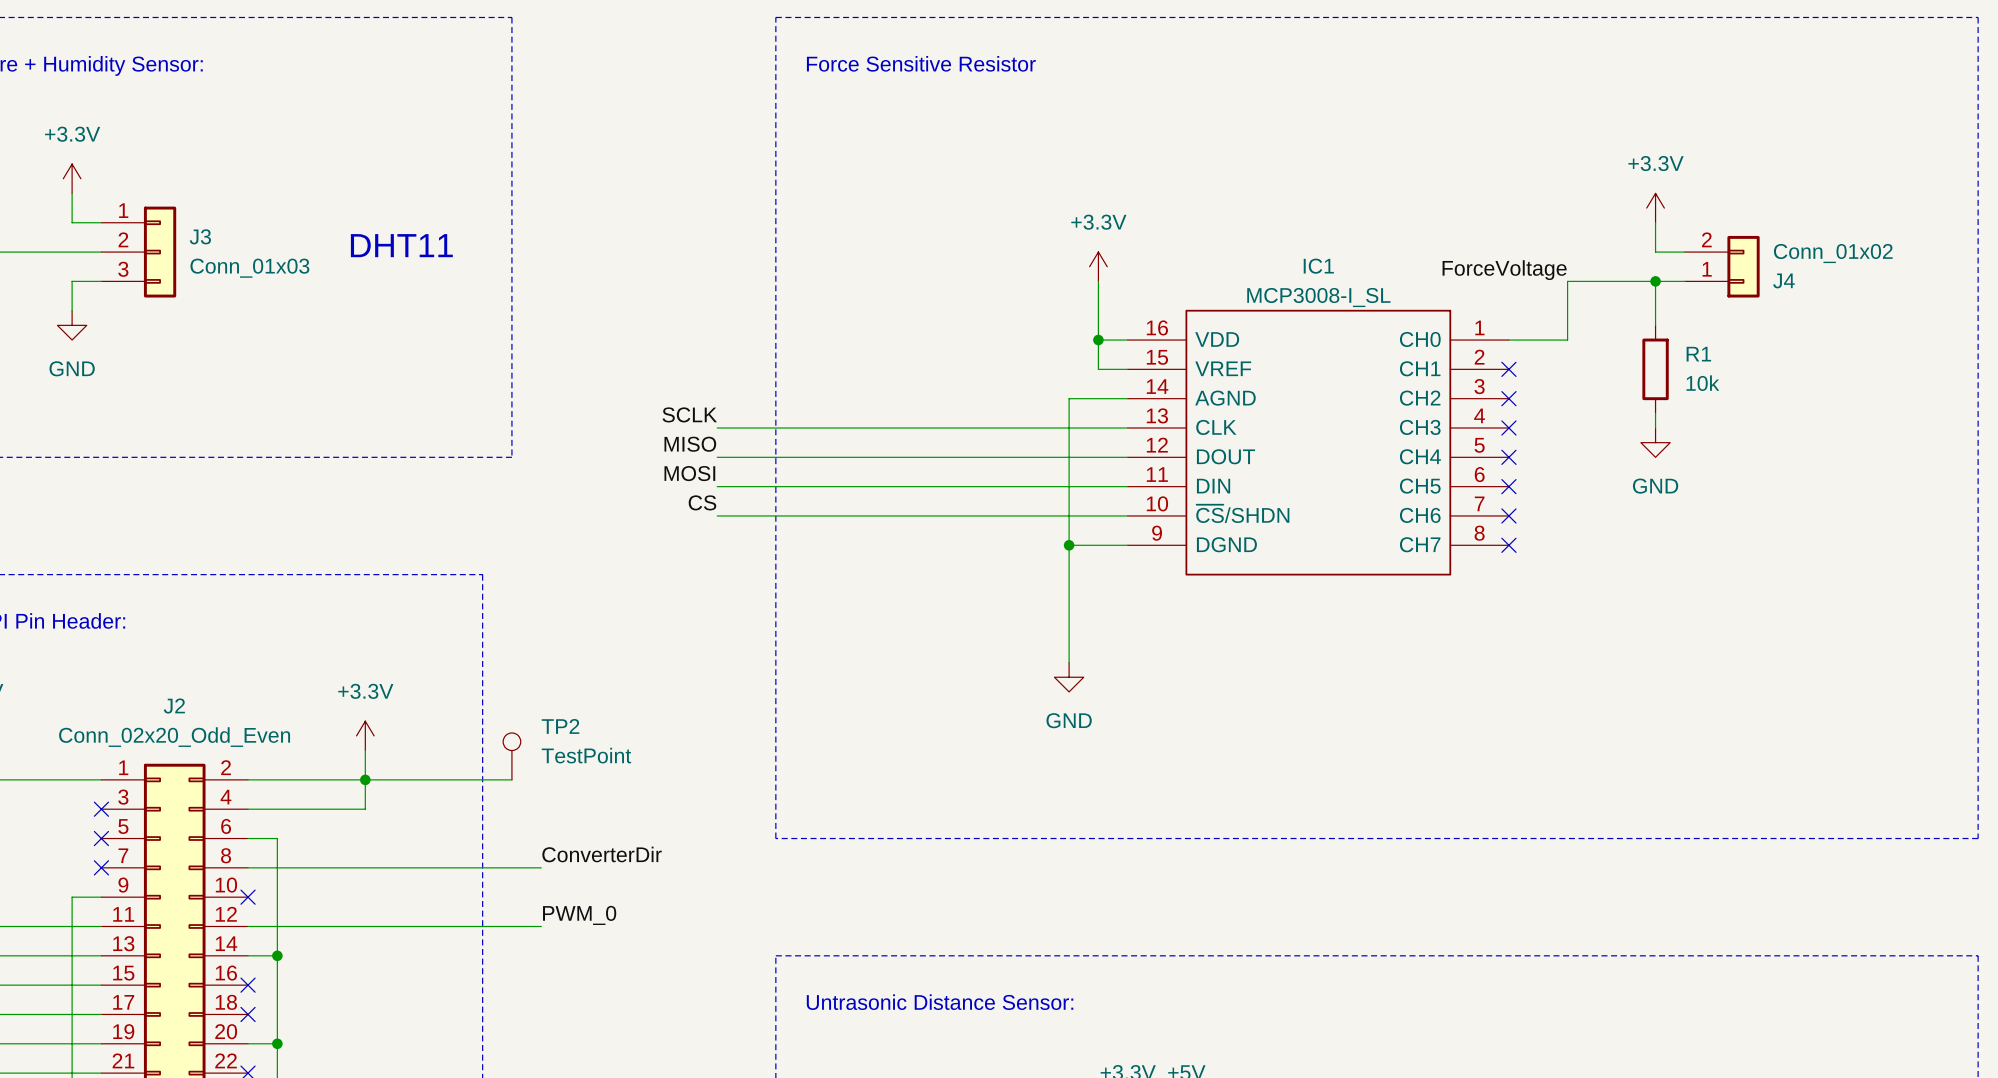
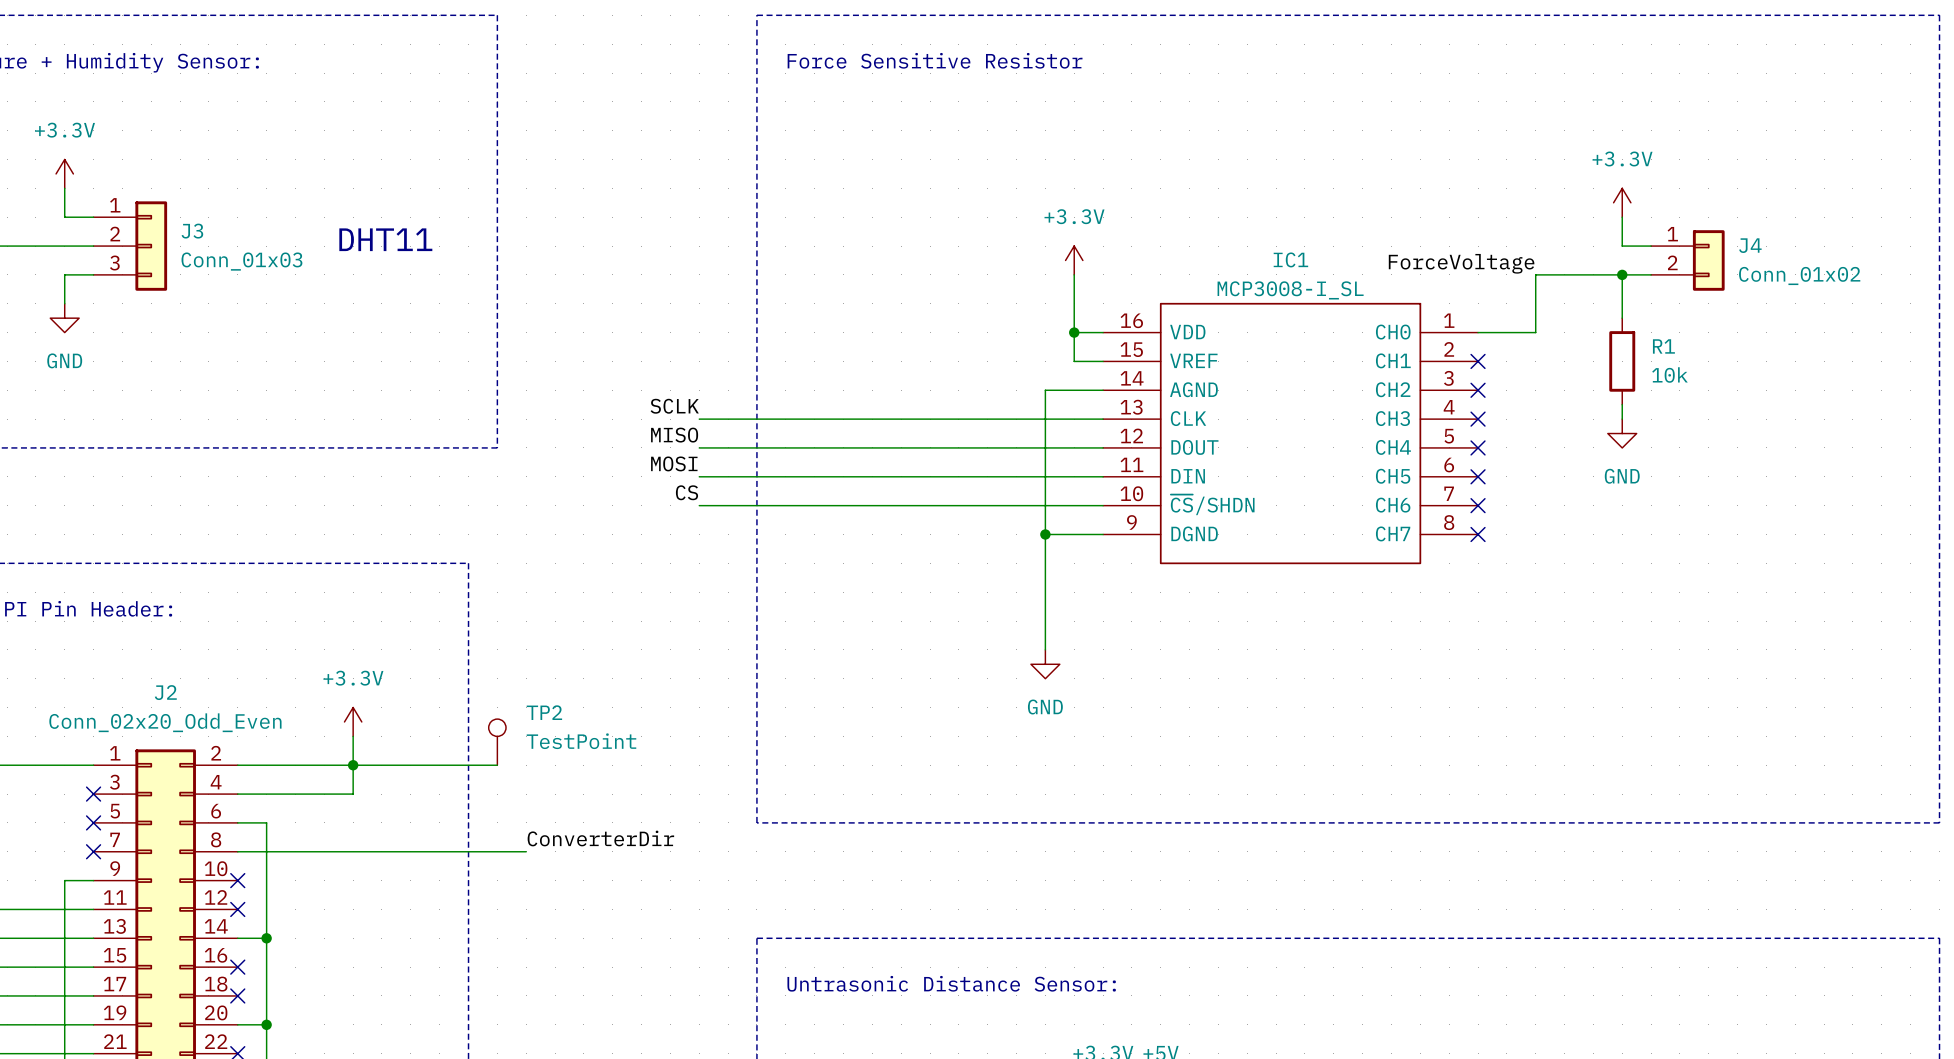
J4 flip: as is (1743, 266) -> up-down (1708, 260)
label: PWM_0 (579, 915) -> none
wire: (248, 926) (541, 926) -> none
no-connect mark: none -> (237, 909)

